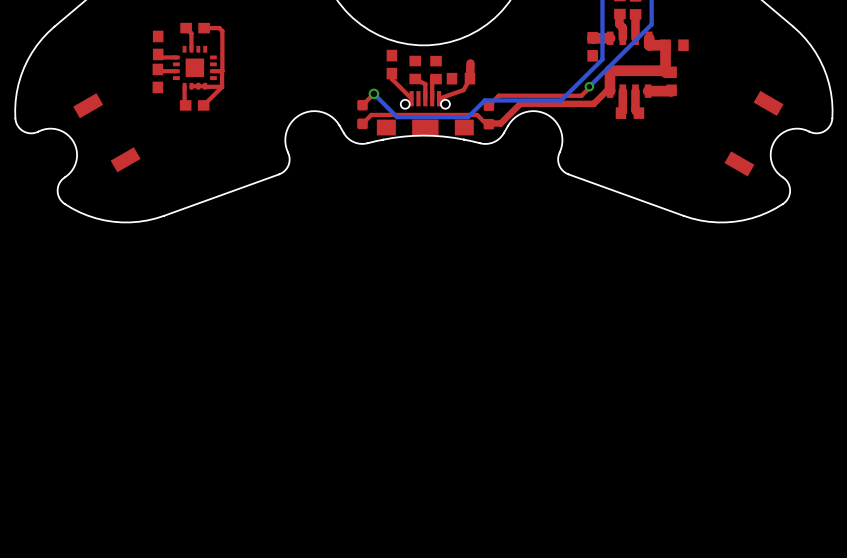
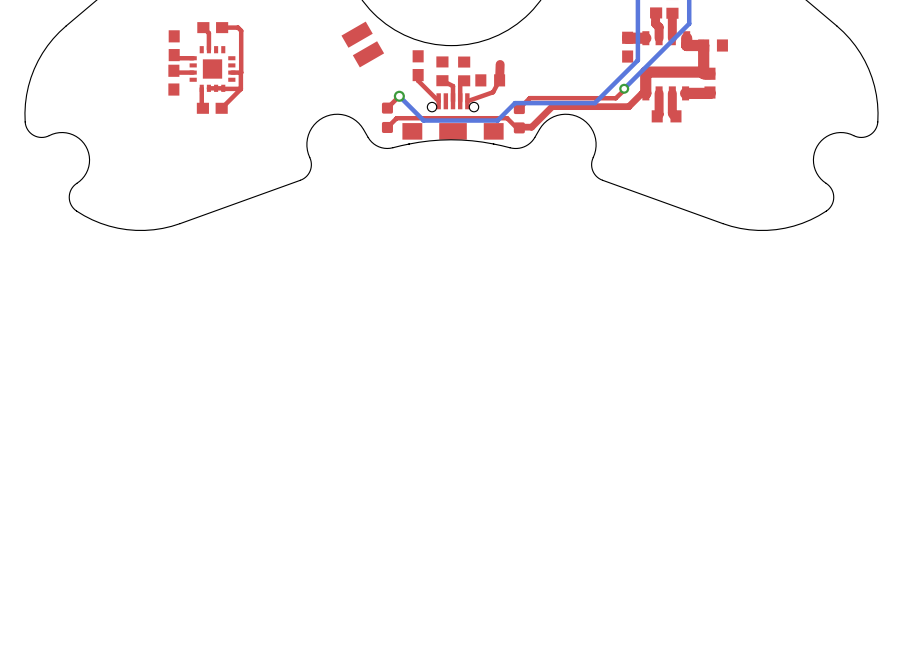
part: none -> (357, 34)
part: none -> (368, 54)
part: (768, 103) -> none
part: (88, 105) -> none
part: (125, 159) -> none
part: (739, 163) -> none

